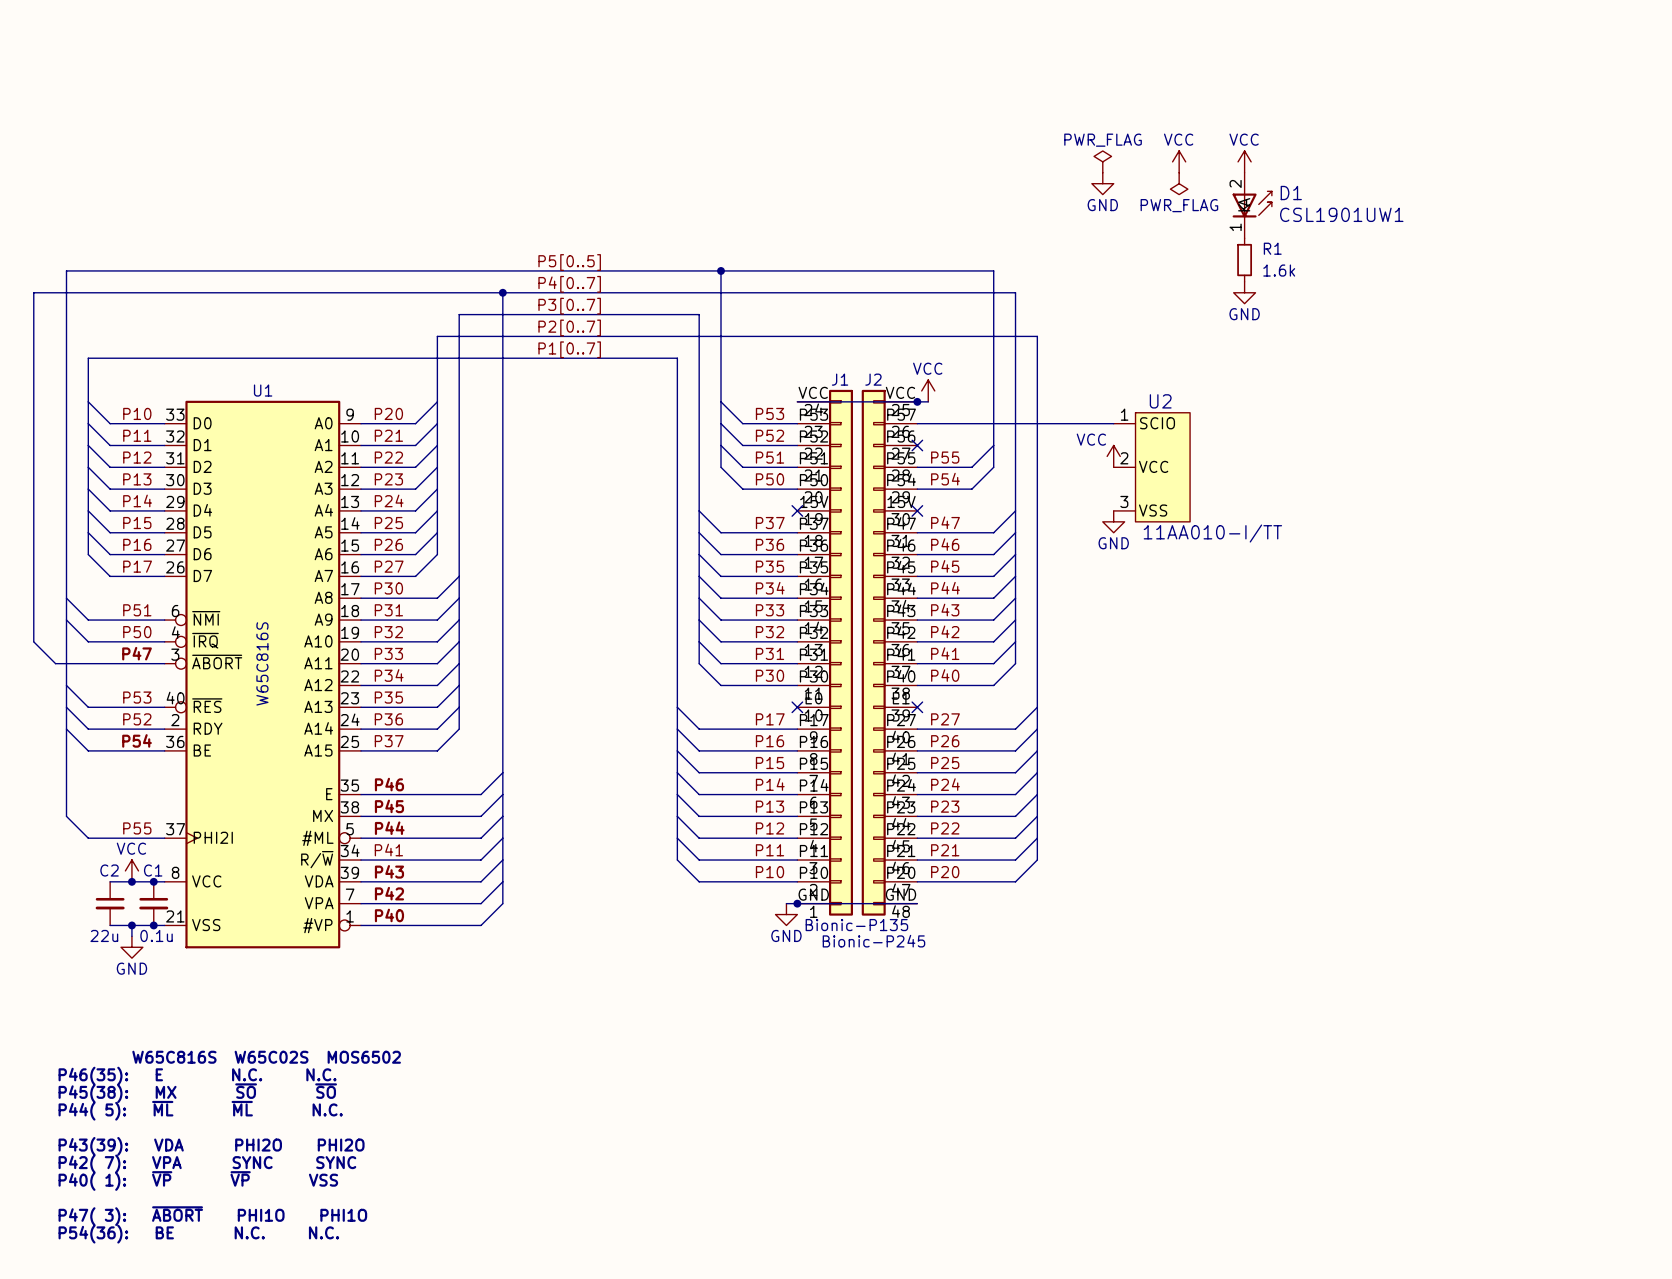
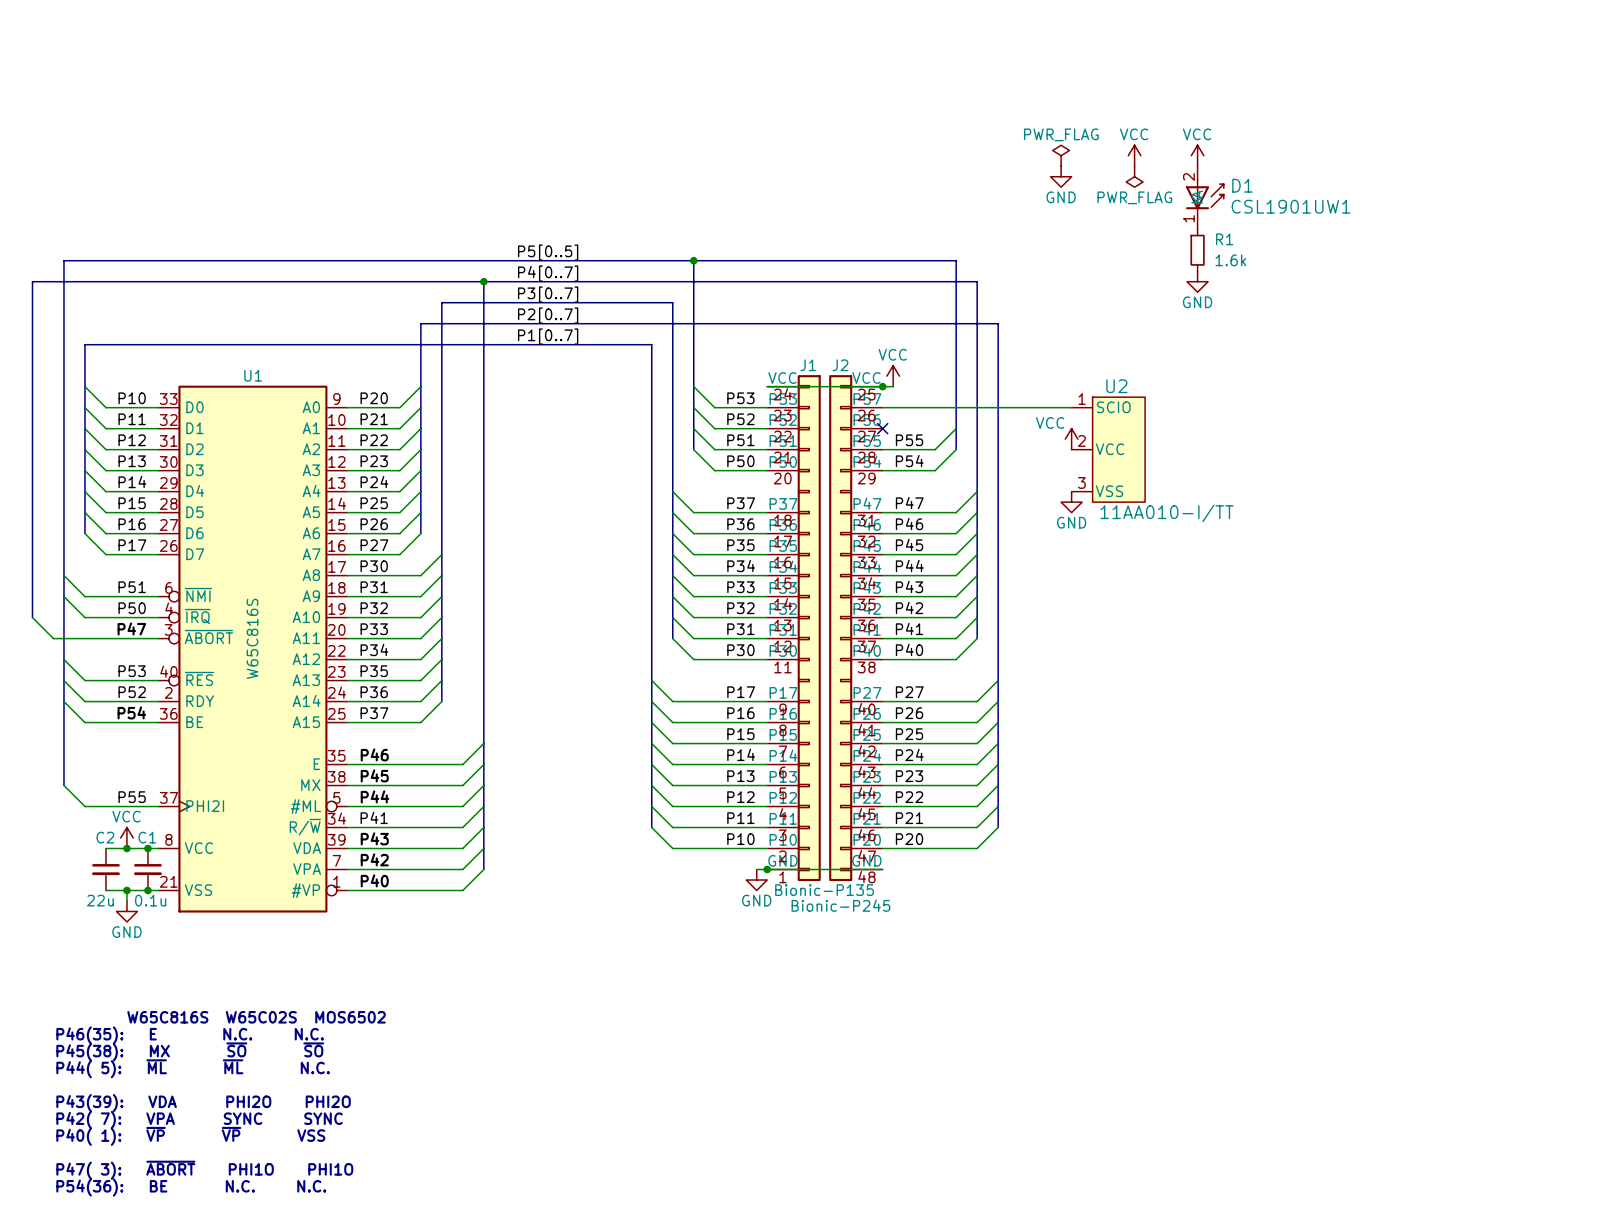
J1 symbol: [797, 389, 853, 916] -> [767, 375, 821, 882]
J2 symbol: [861, 389, 918, 916] -> [829, 375, 883, 882]
no-connect mark: (797, 510) -> none
no-connect mark: (917, 510) -> none
no-connect mark: (797, 707) -> none
no-connect mark: (917, 707) -> none

